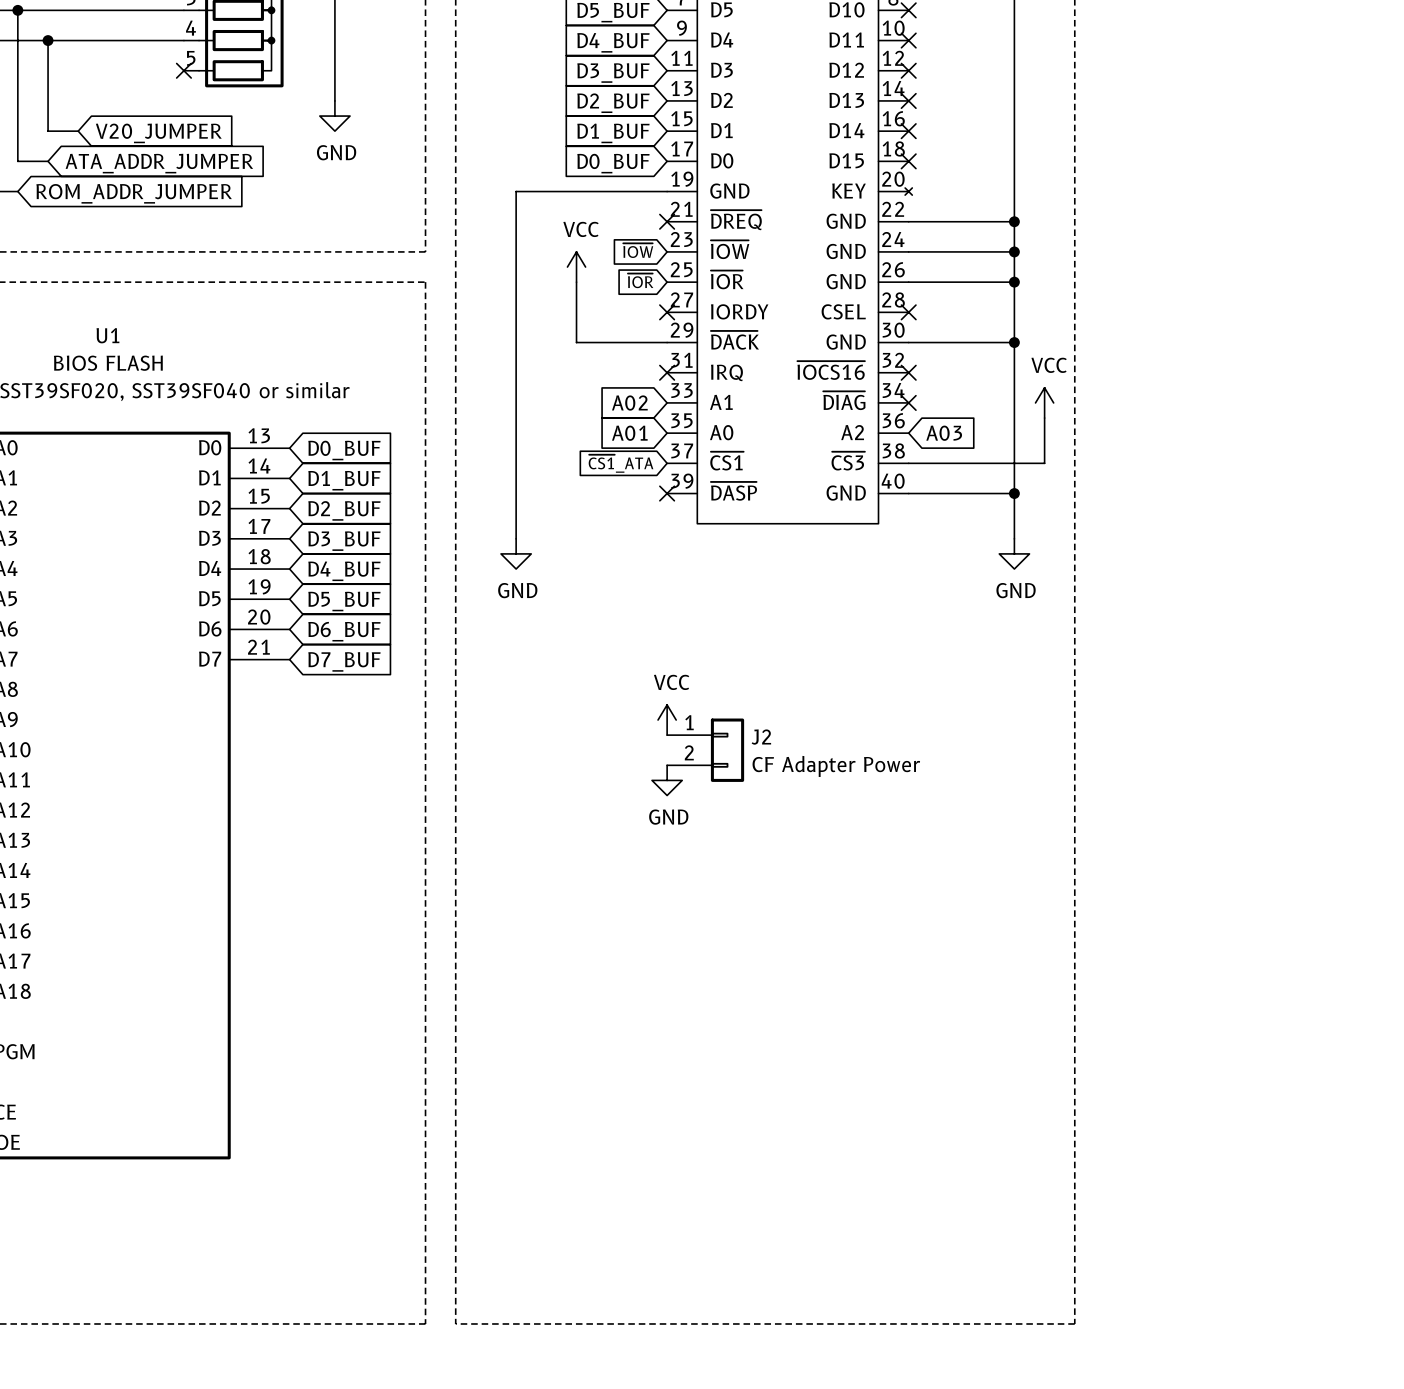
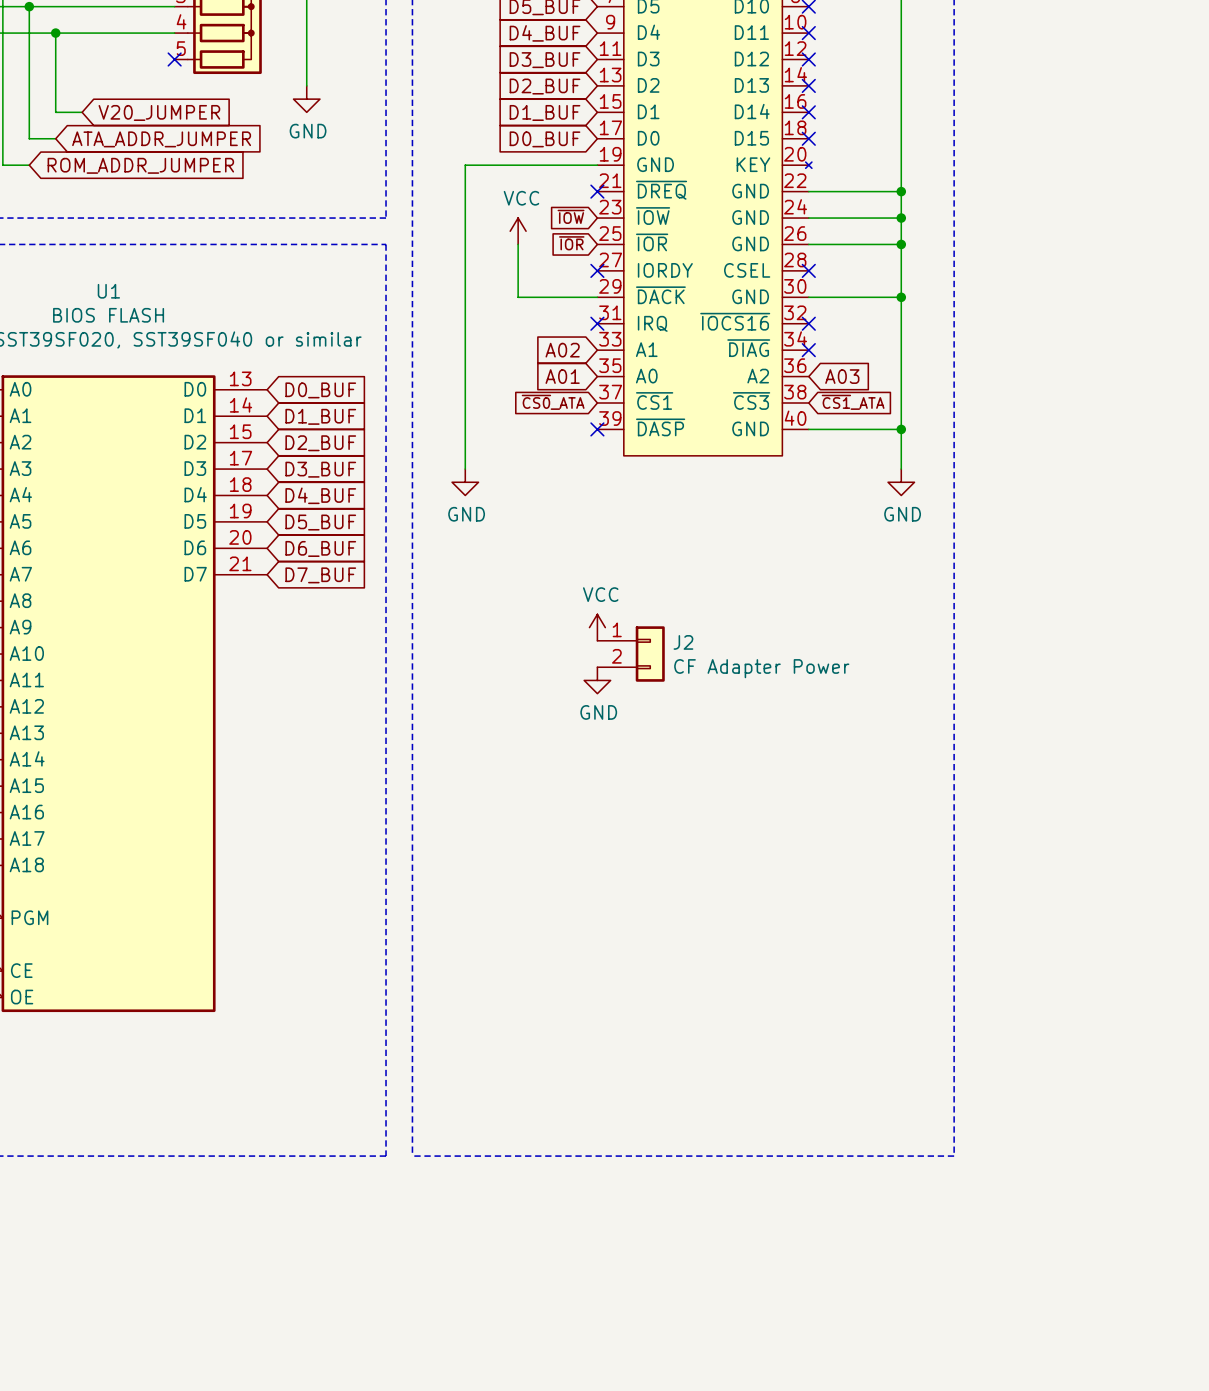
power symbol: VCC (1044, 402) -> none
wire: (1044, 418) (1044, 463) (908, 463) -> none
global label: ~{CS1}_ATA (621, 463) -> ~{CS0}_ATA (553, 402)
global label: none -> ~{CS1}_ATA (853, 402)

